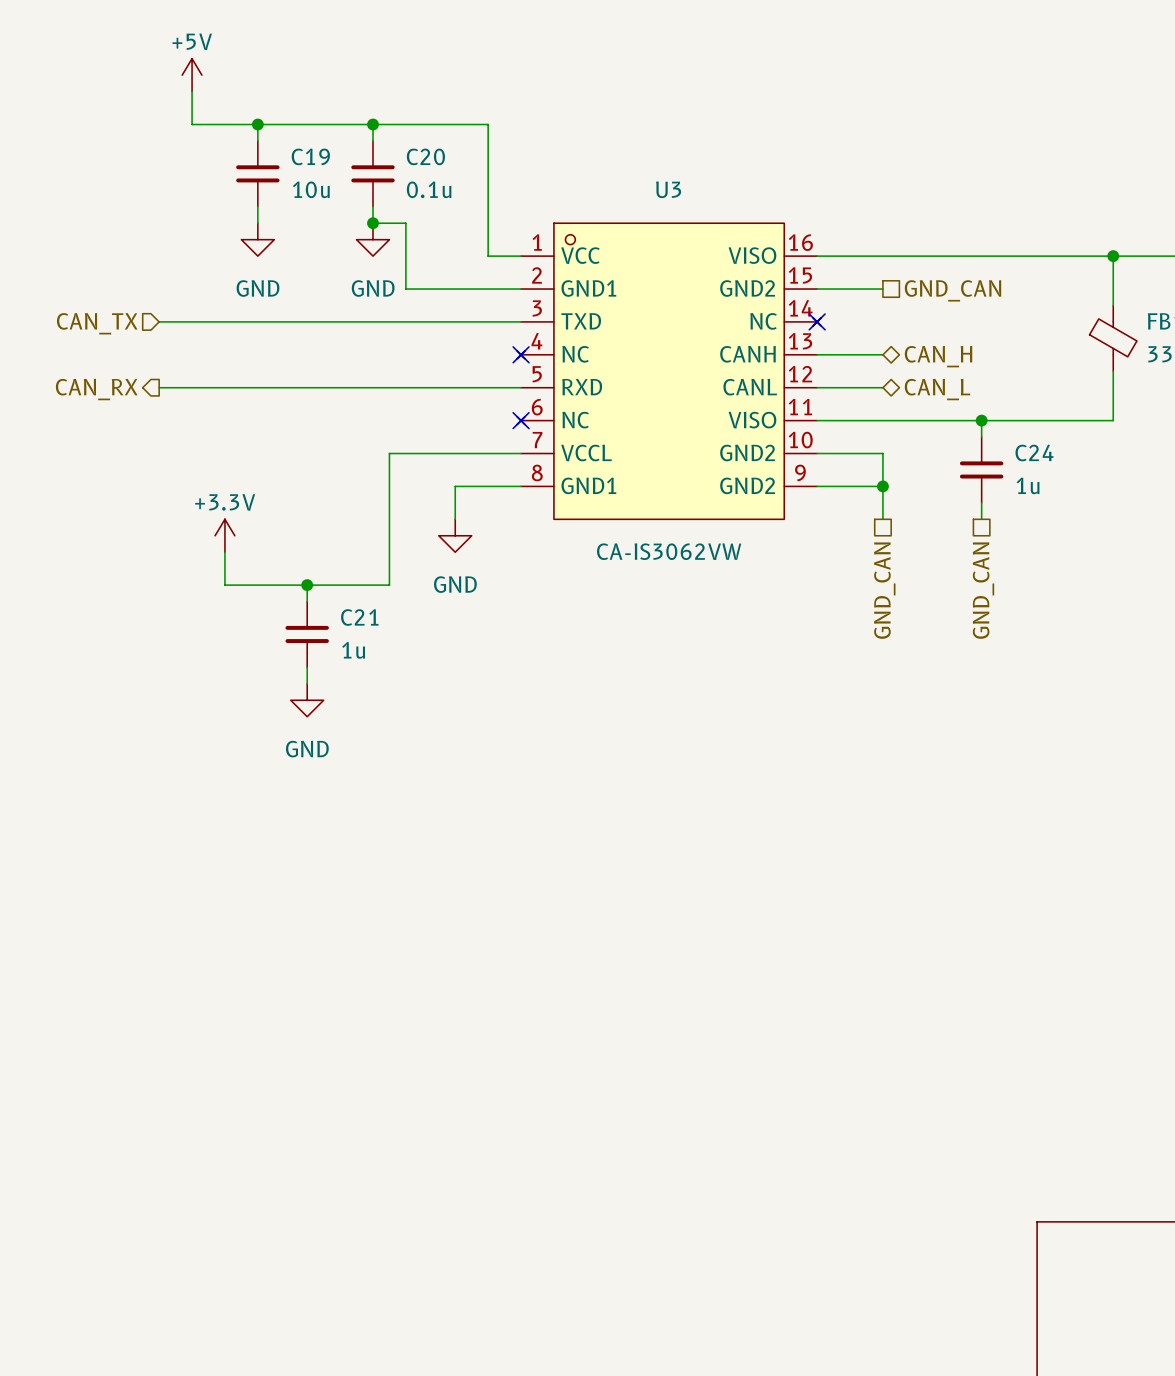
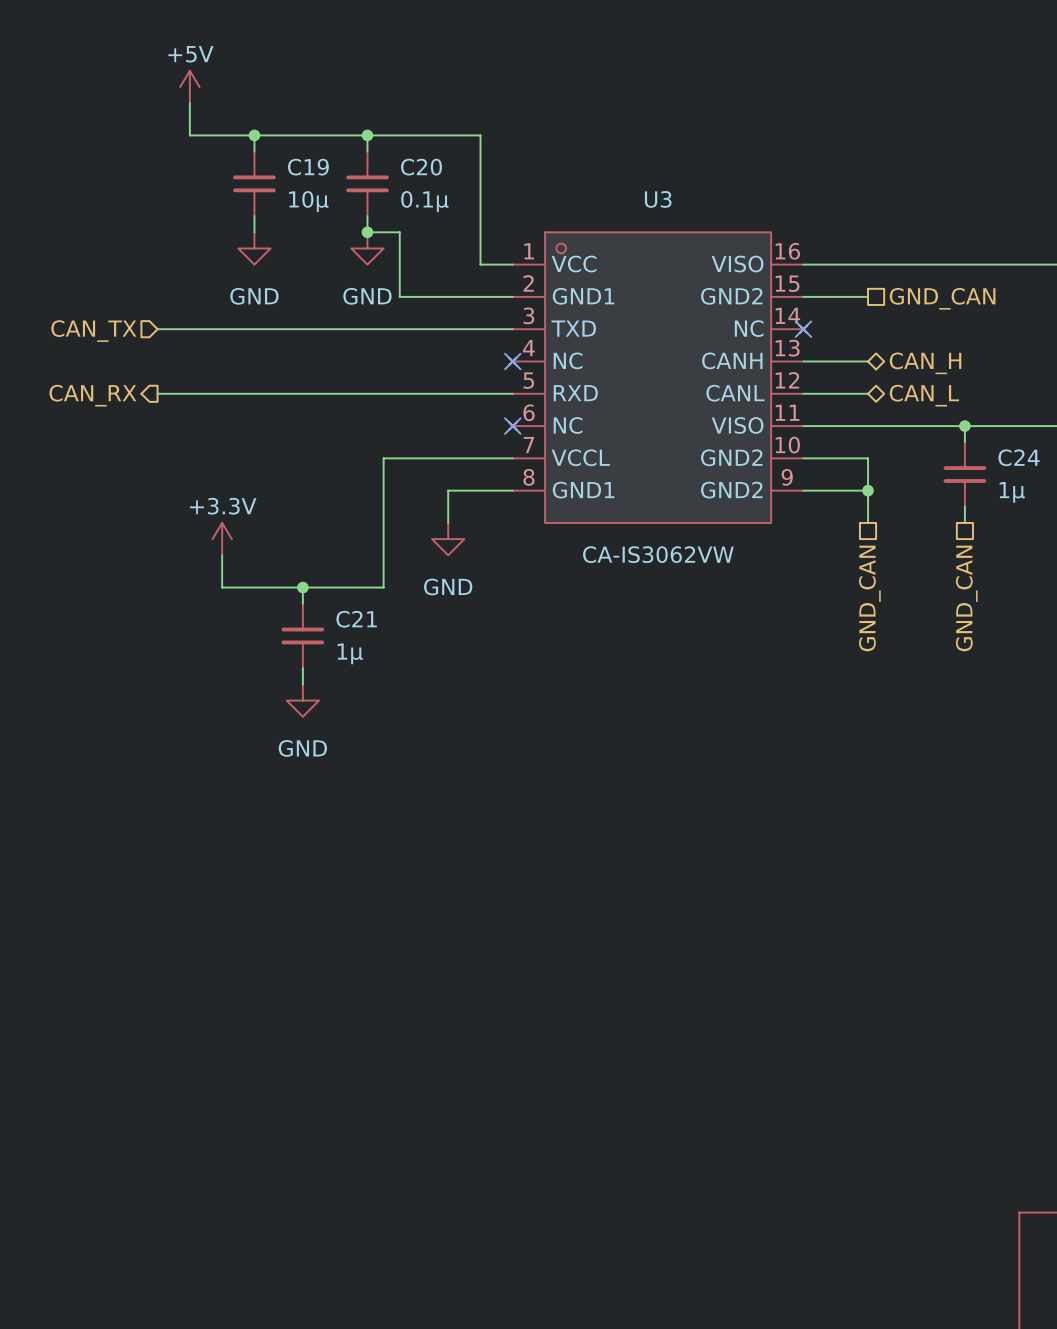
C19 value: 10u (311, 189) -> 10μ (308, 201)
C20 value: 0.1u (429, 189) -> 0.1μ (424, 201)
C24 value: 1u (1028, 485) -> 1μ (1012, 492)
C21 value: 1u (353, 650) -> 1μ (350, 653)

